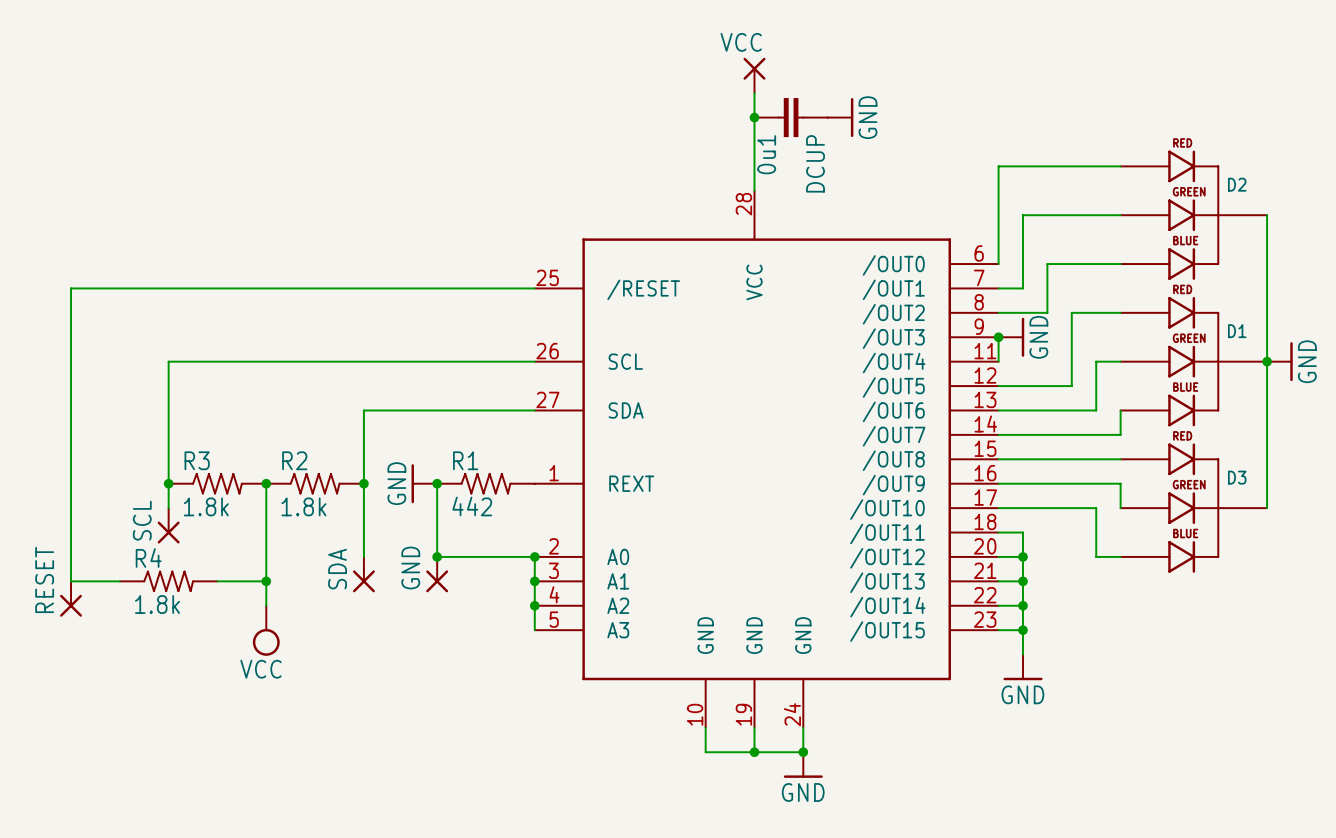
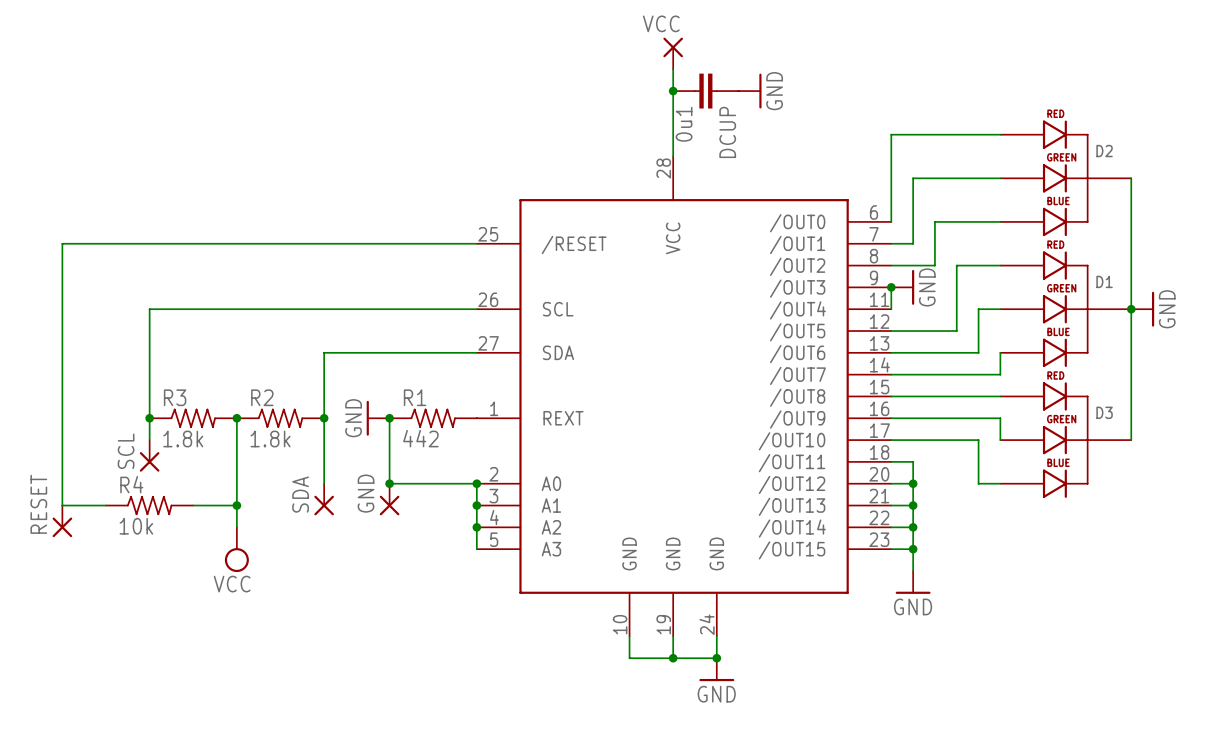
R4 value: 1.8k (157, 604) -> 10k (136, 526)

